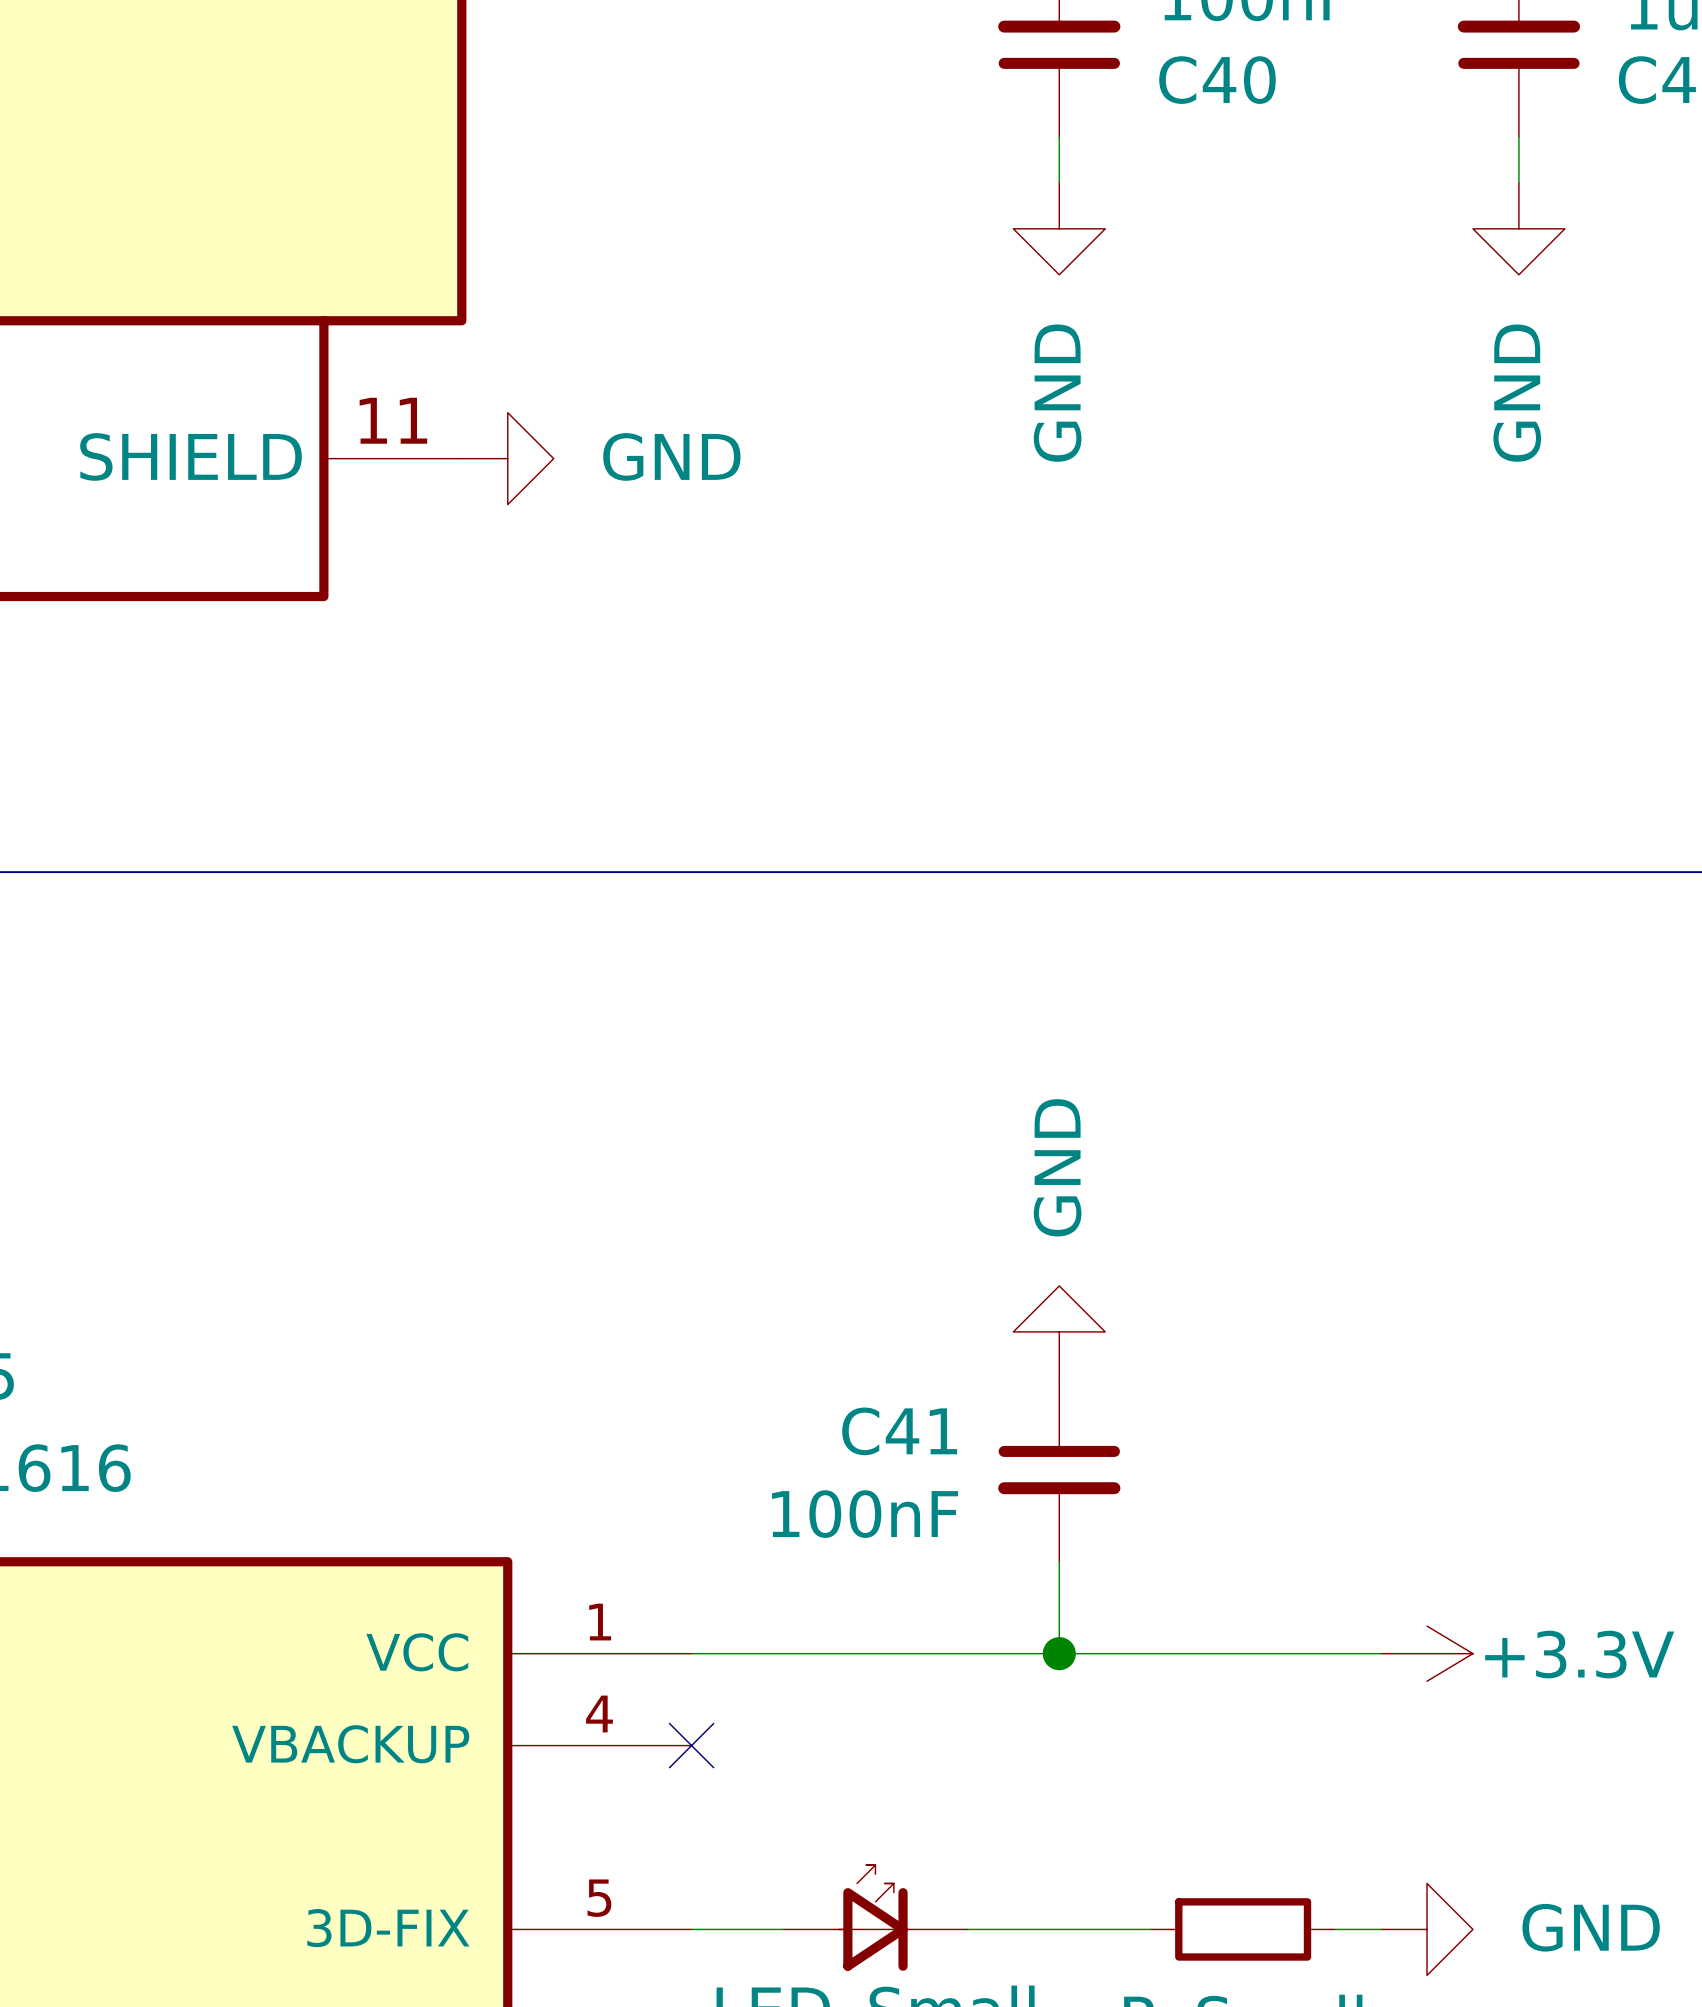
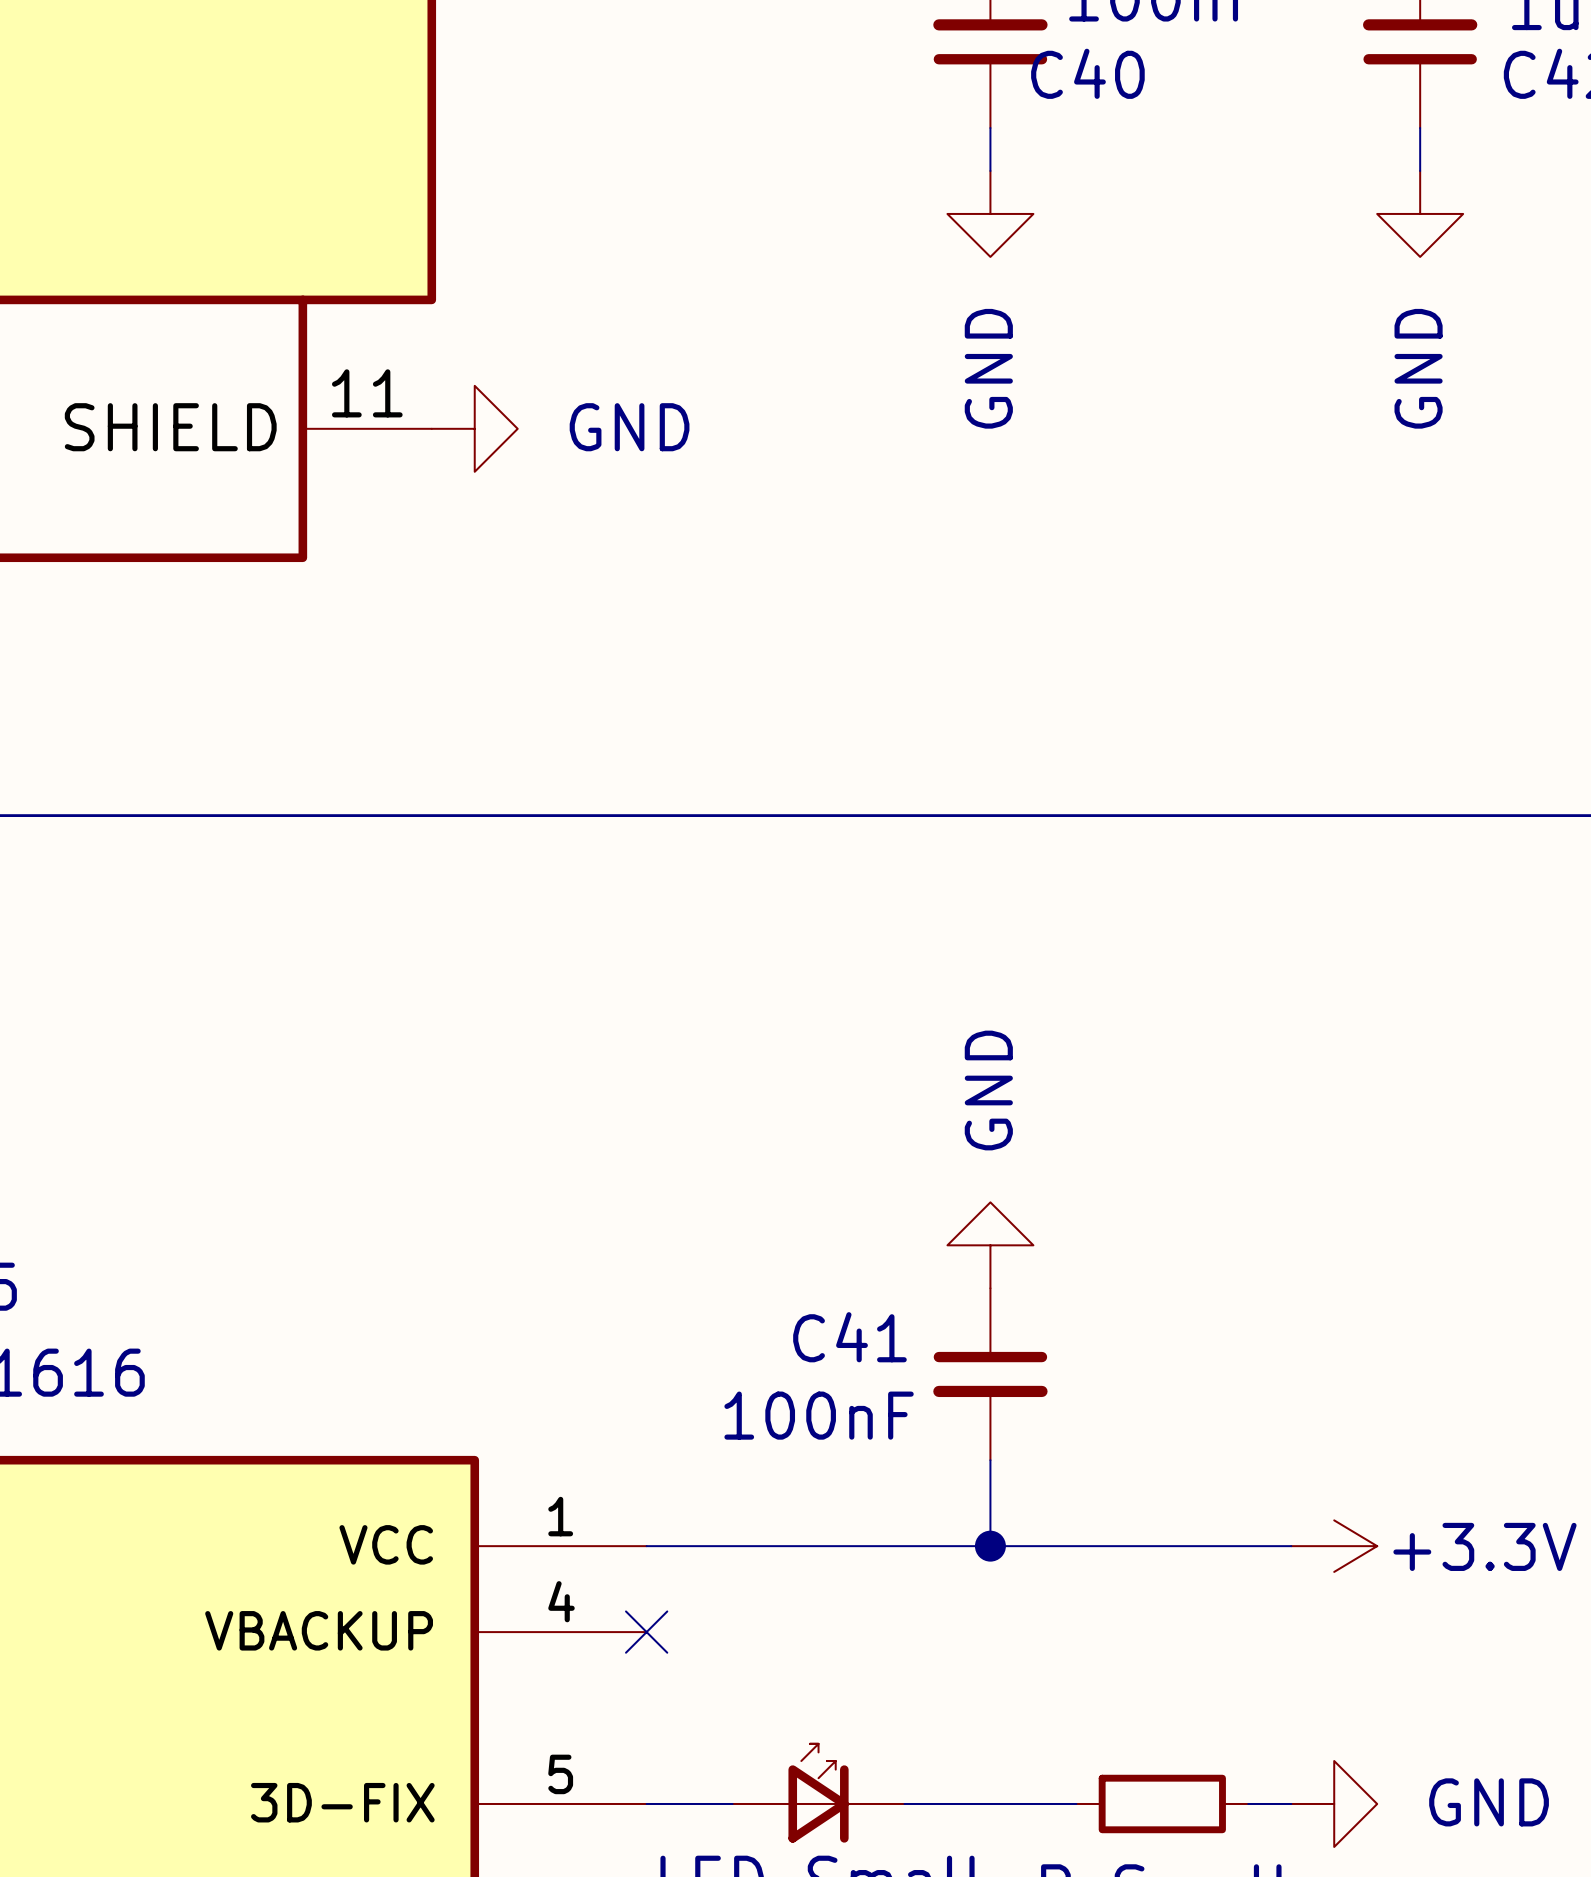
C40 name position: C40 (1217, 80) -> C40 (1087, 73)

